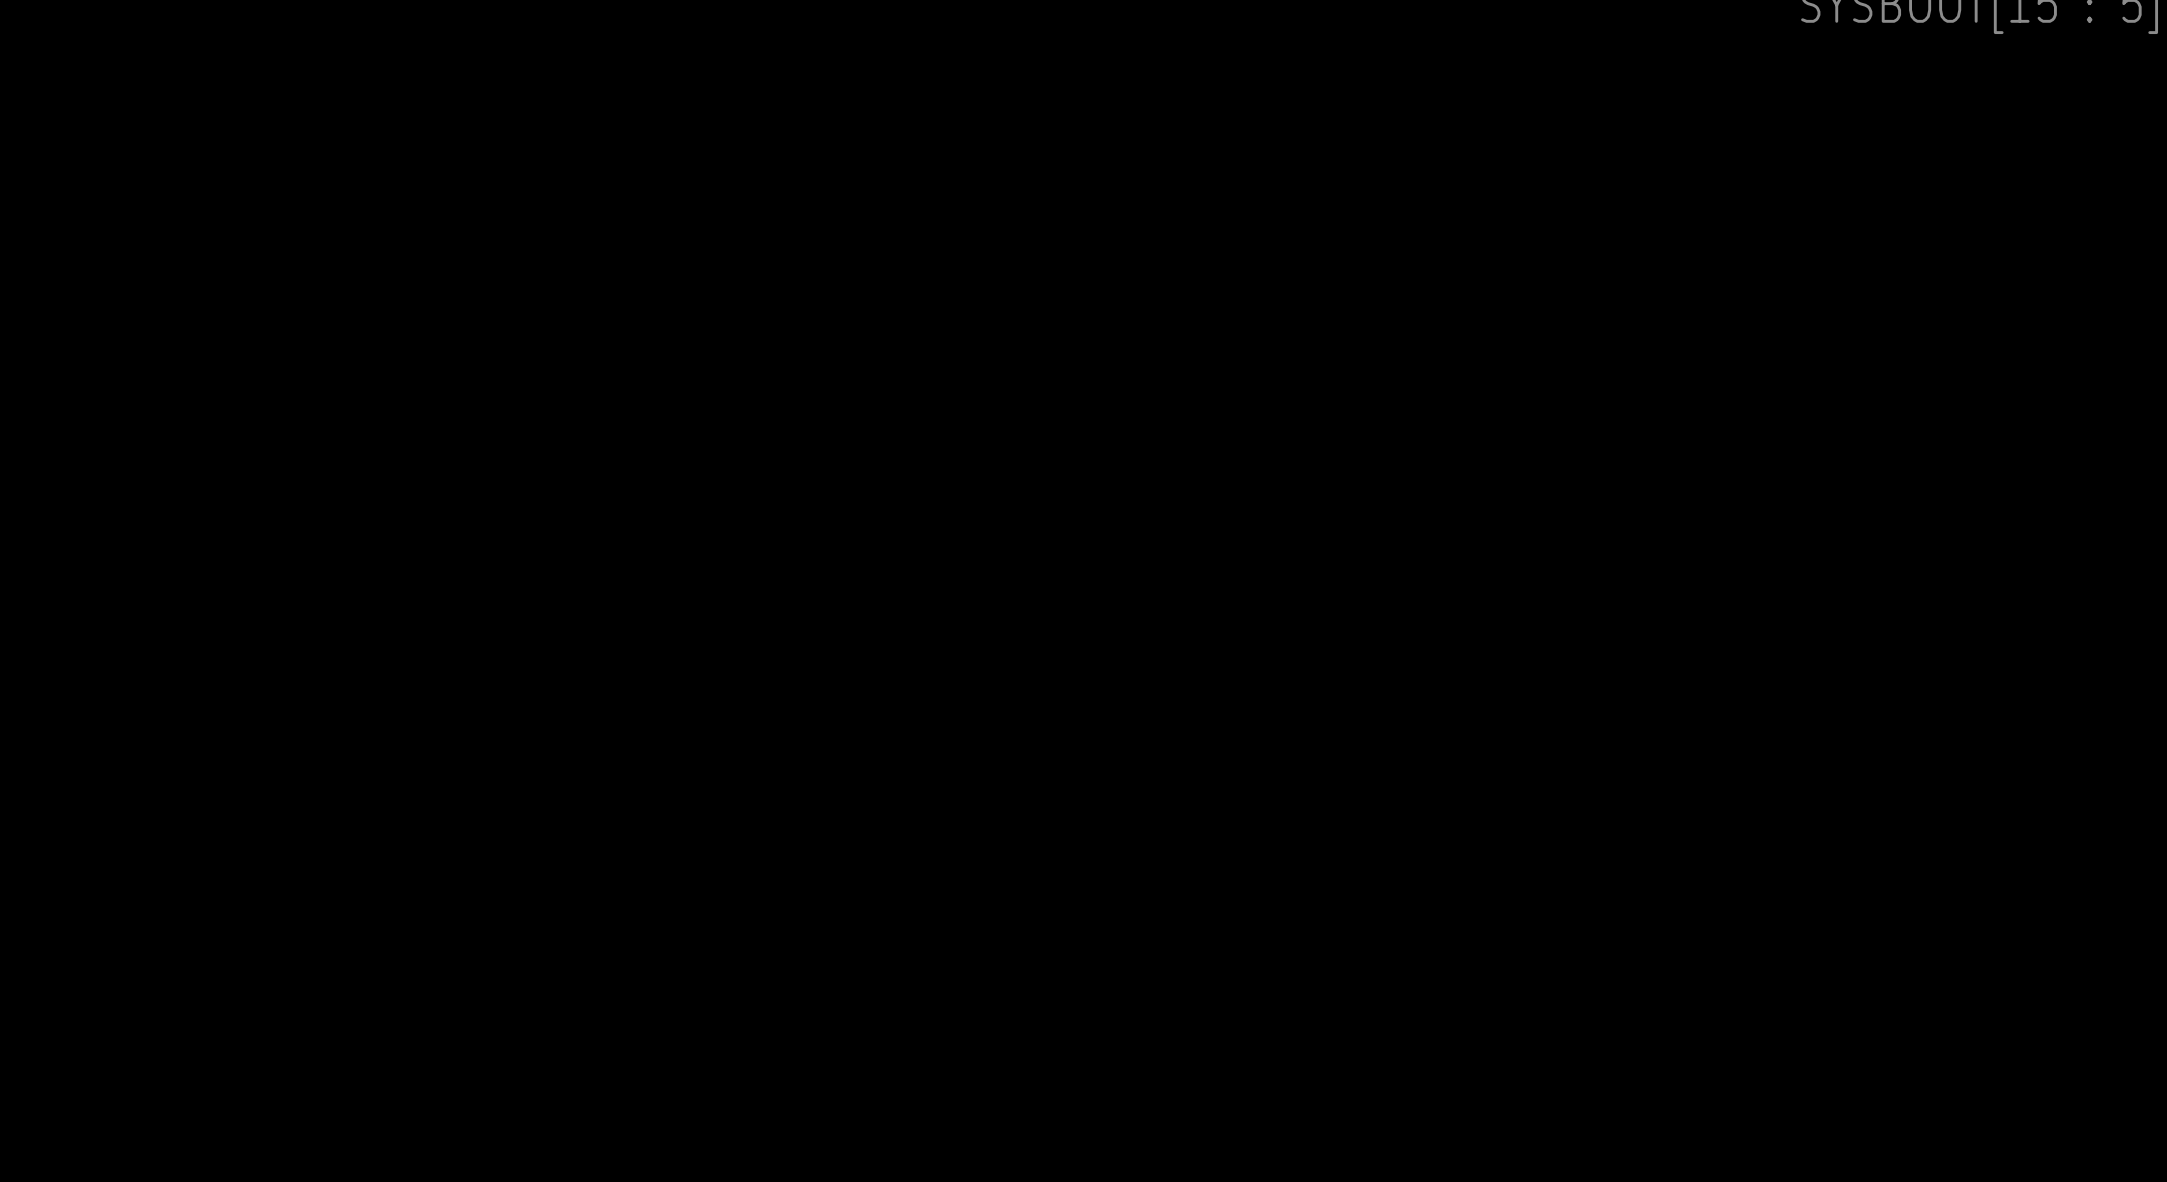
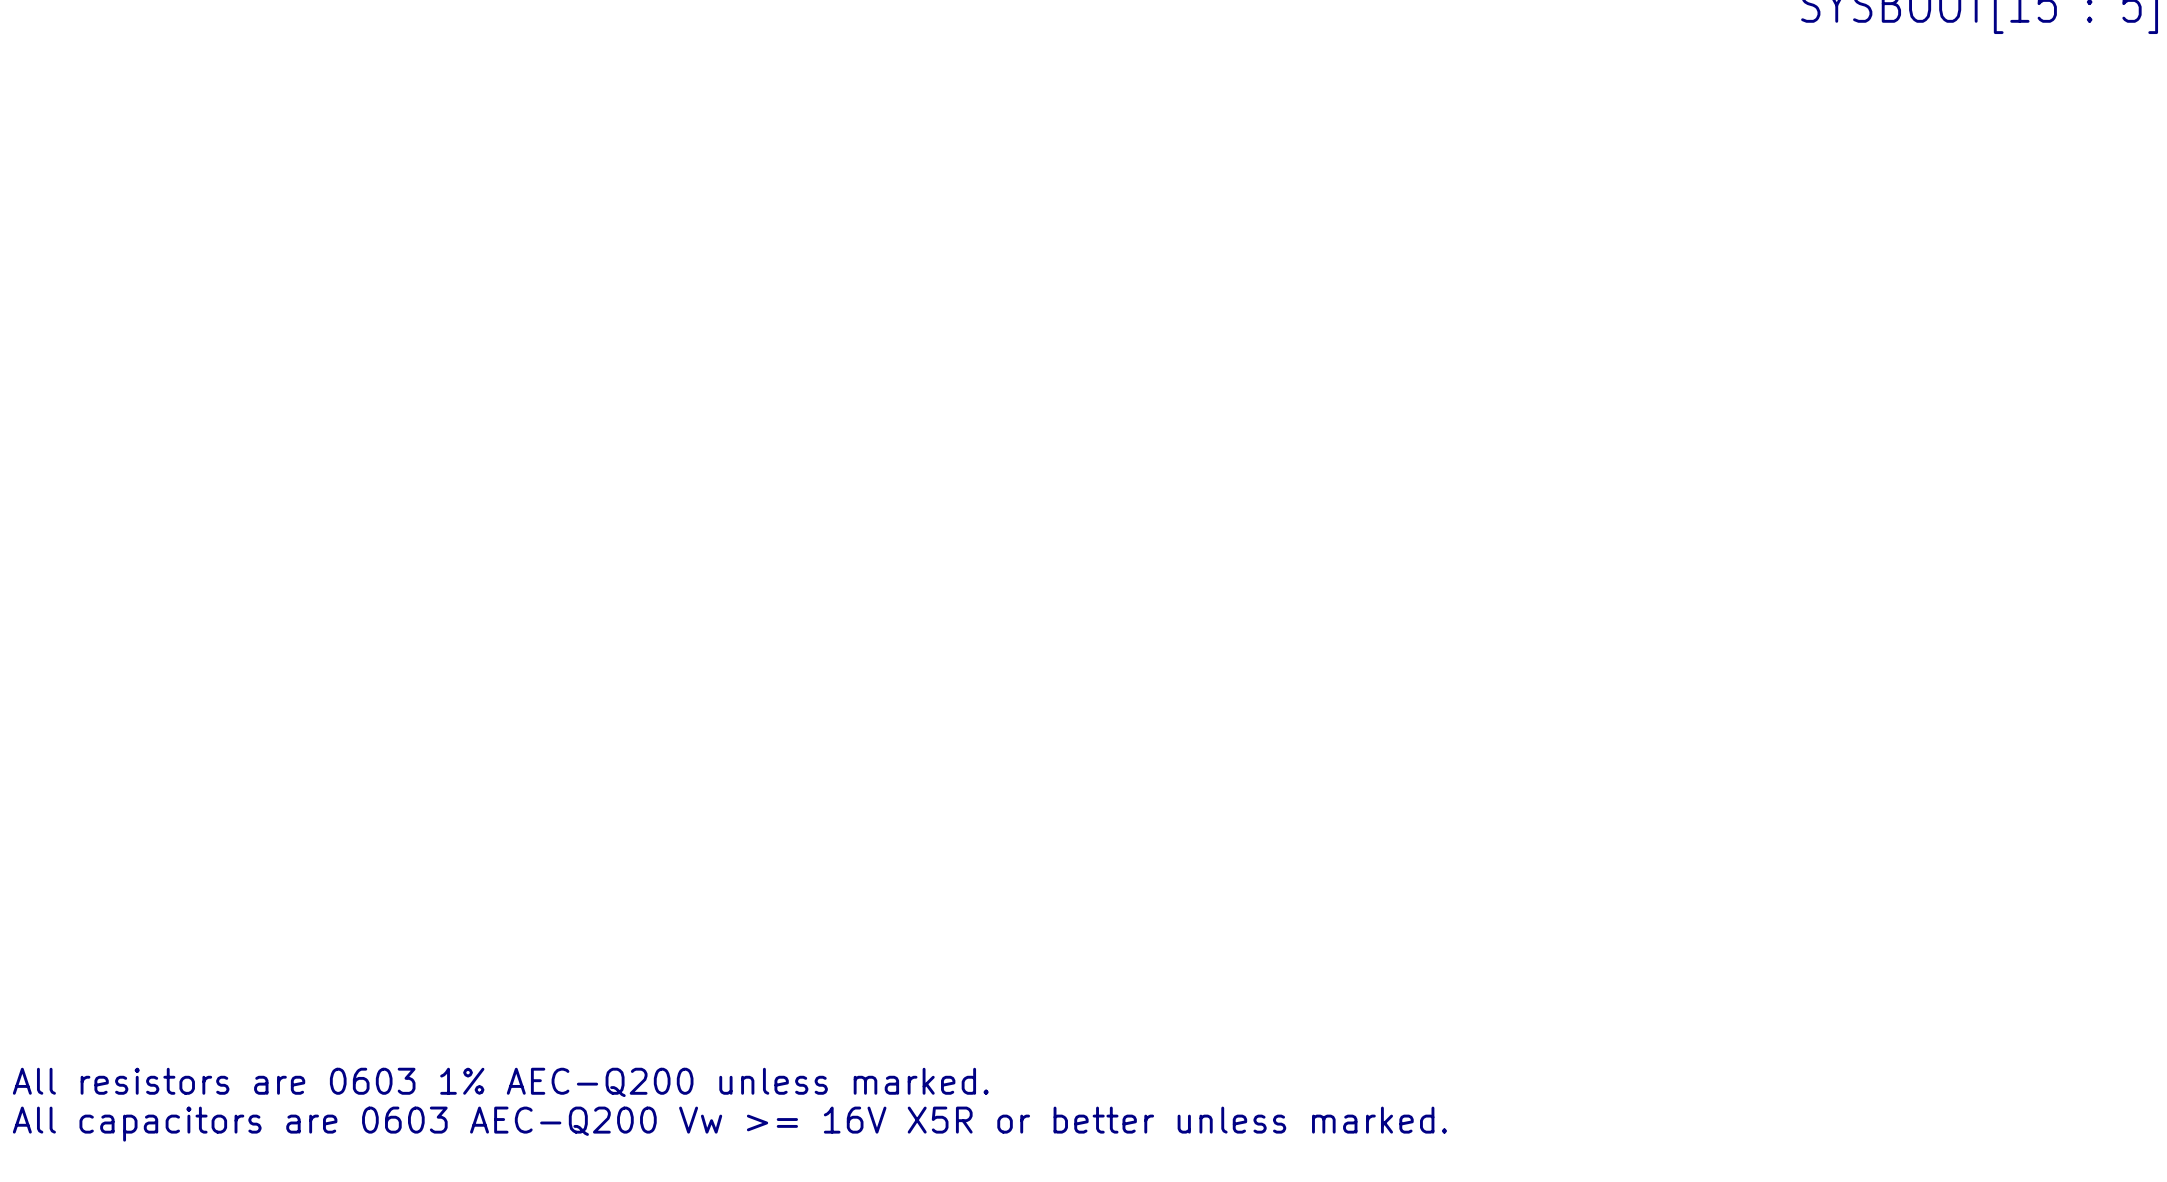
text: none -> All resistors are 0603 1% AEC-Q200 unless marked. (500, 1082)
text: none -> All capacitors are 0603 AEC-Q200 Vw >= 16V X5R or better unless marked. (729, 1124)

